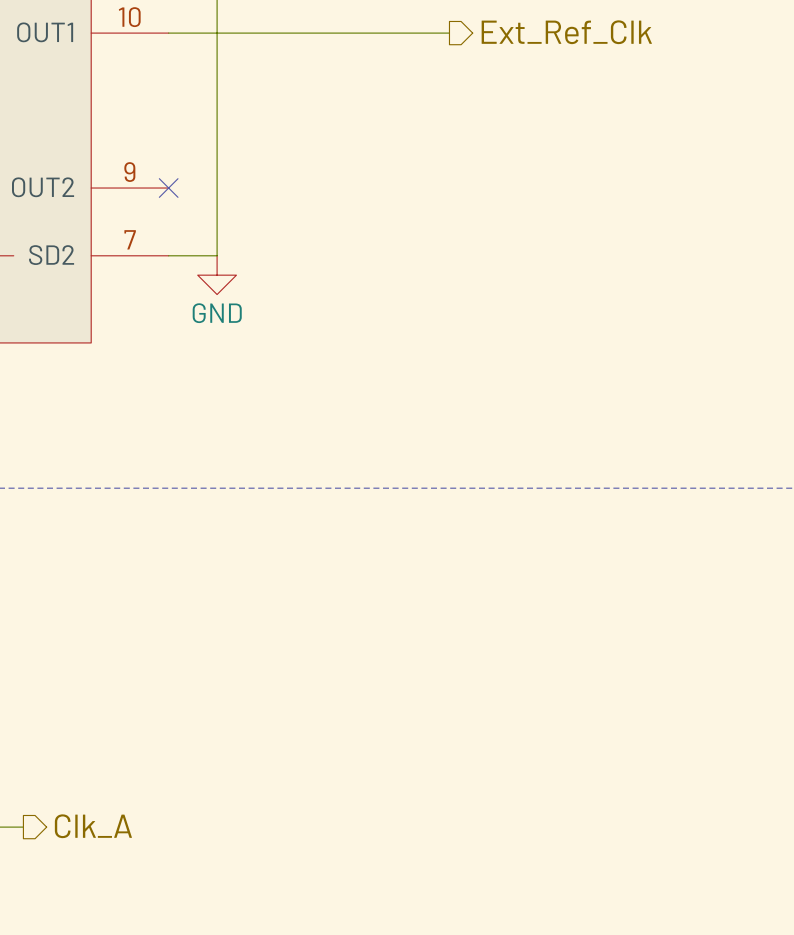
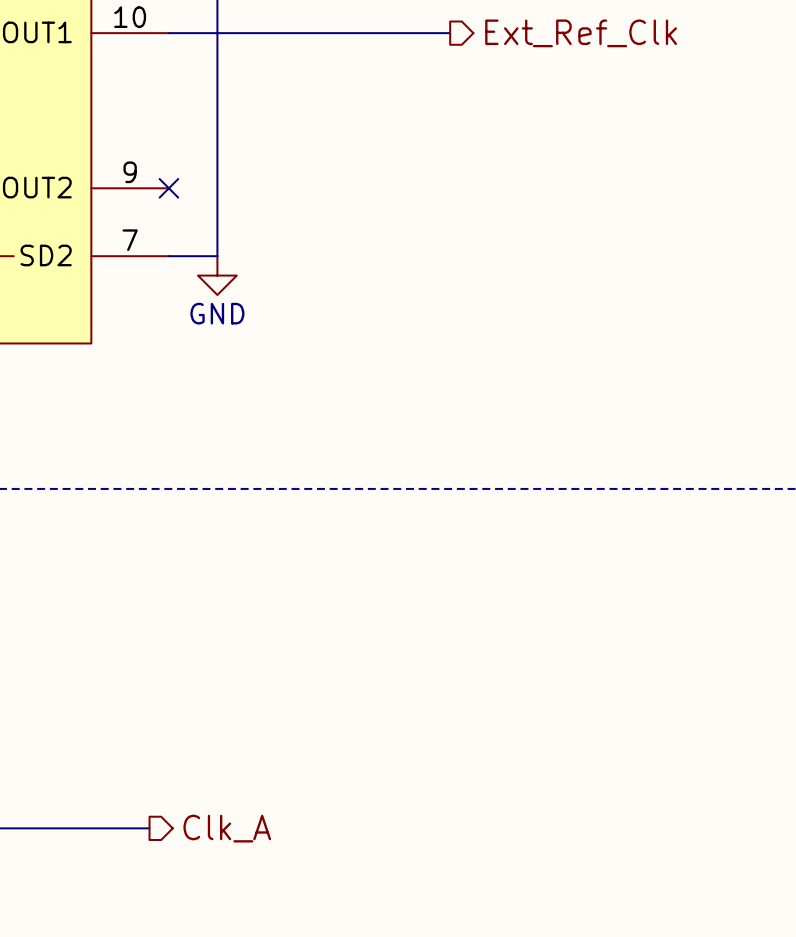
hierarchical label position: Clk_A (93, 826) -> Clk_A (227, 828)
wire: none -> (23, 828) (149, 828)

